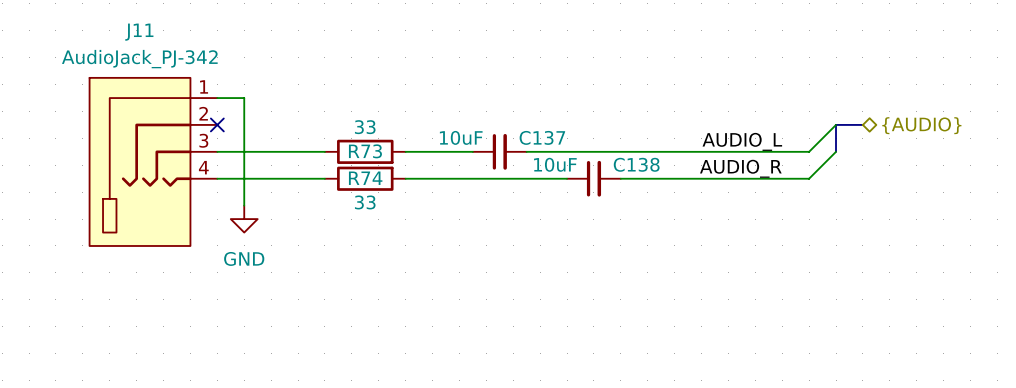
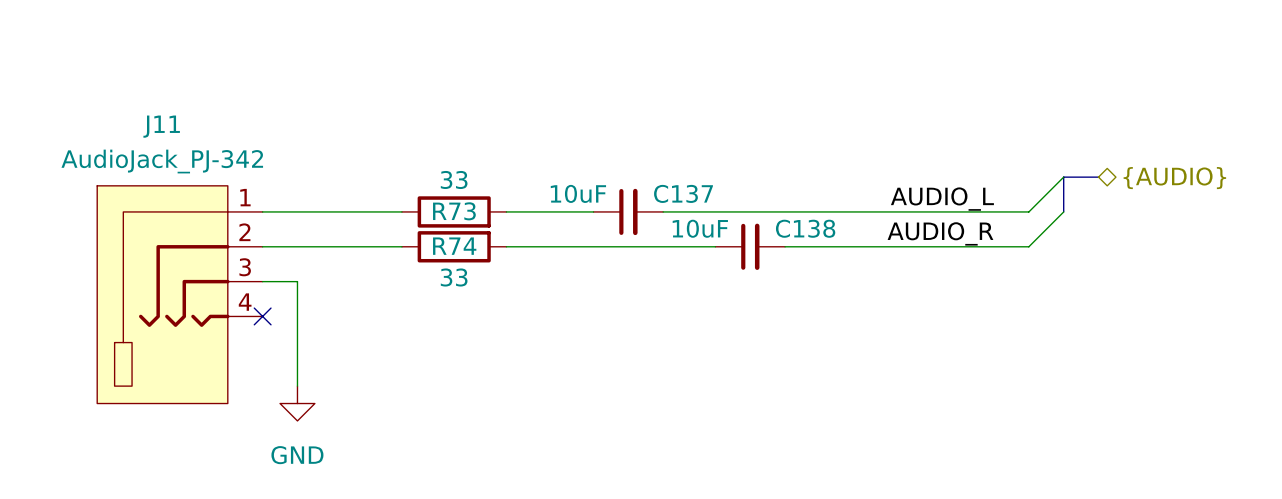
wire: (217, 98) (244, 98) (244, 205) -> none
no-connect mark: (217, 124) -> none
J11 position: (153, 161) -> (179, 294)
wire: none -> (262, 281) (297, 281) (297, 386)
power symbol position: GND (244, 219) -> GND (297, 403)
no-connect mark: none -> (262, 316)

